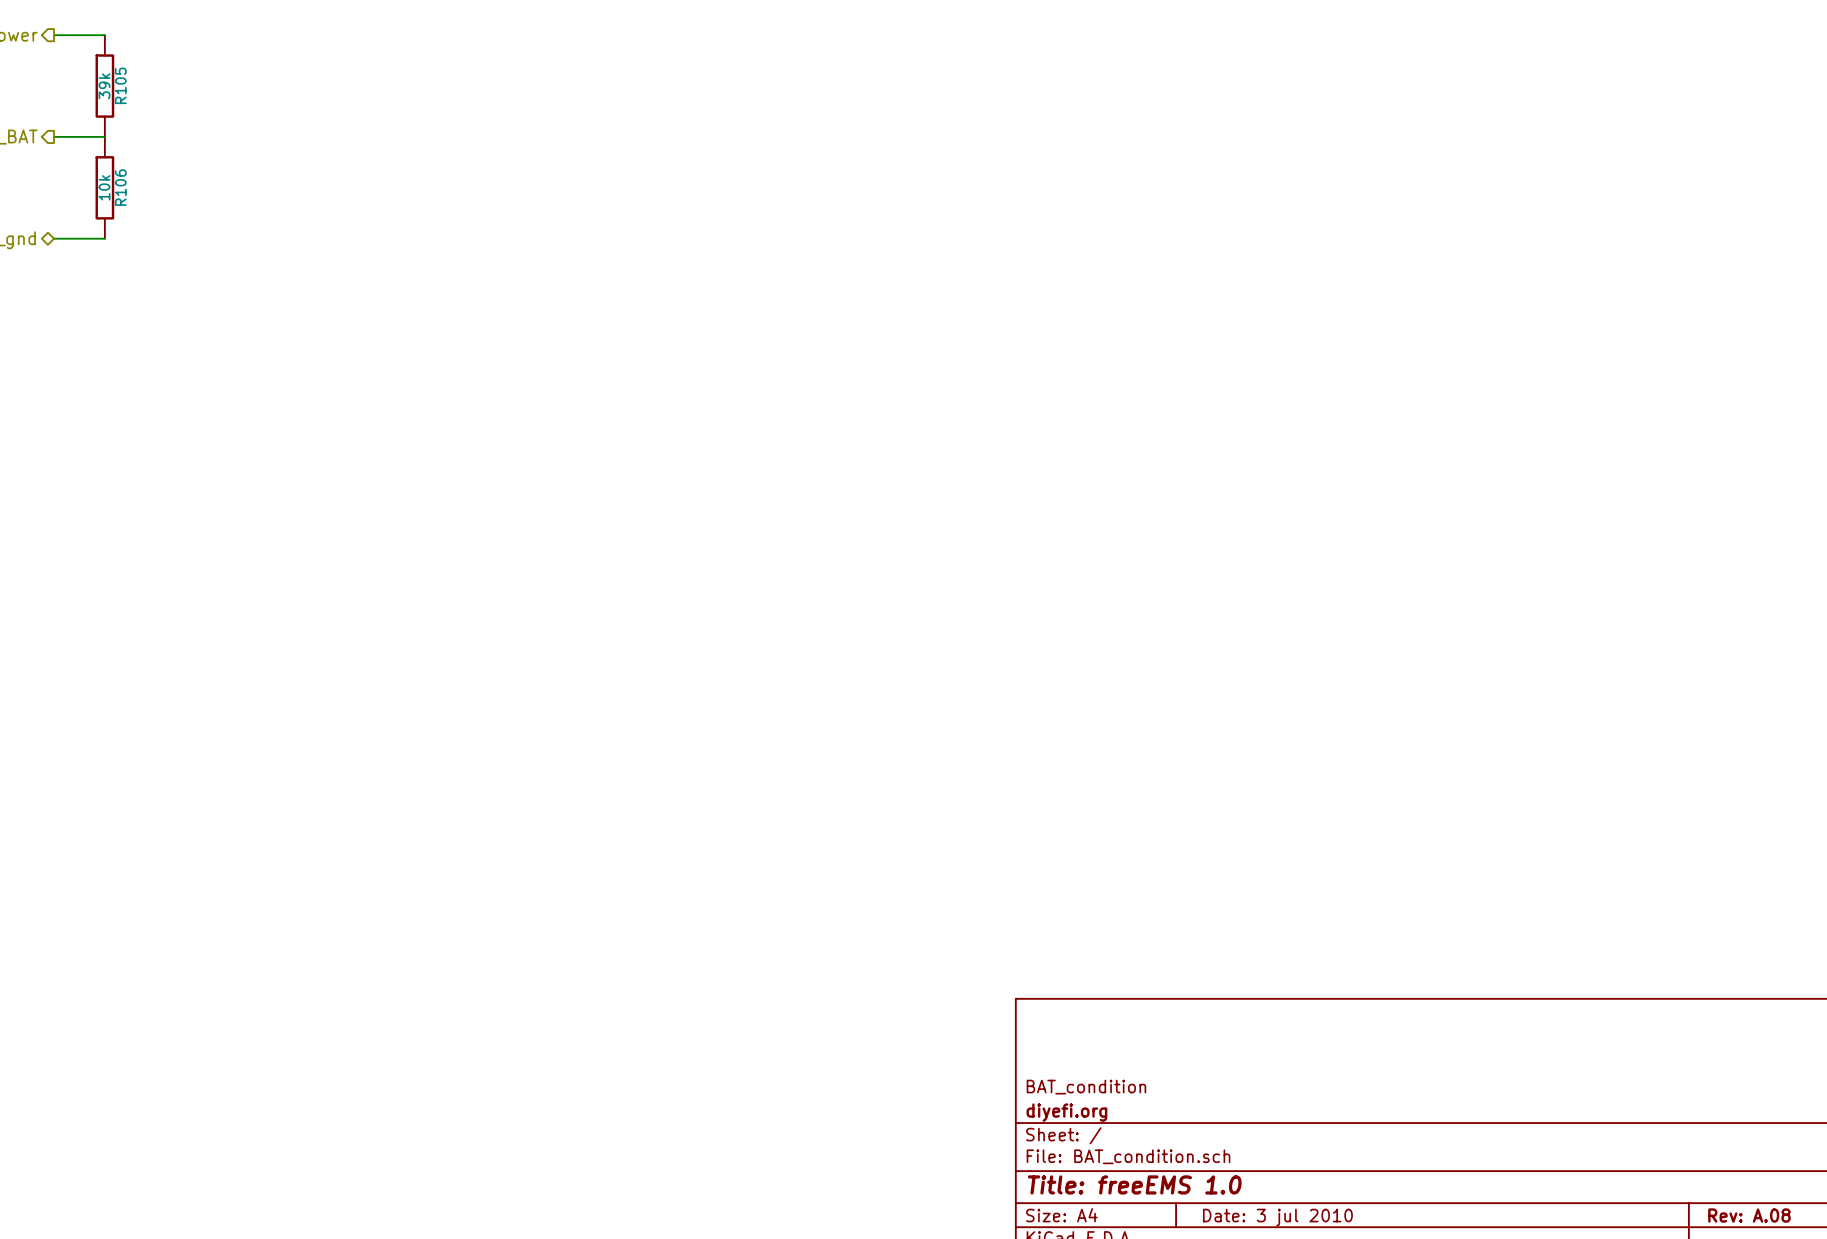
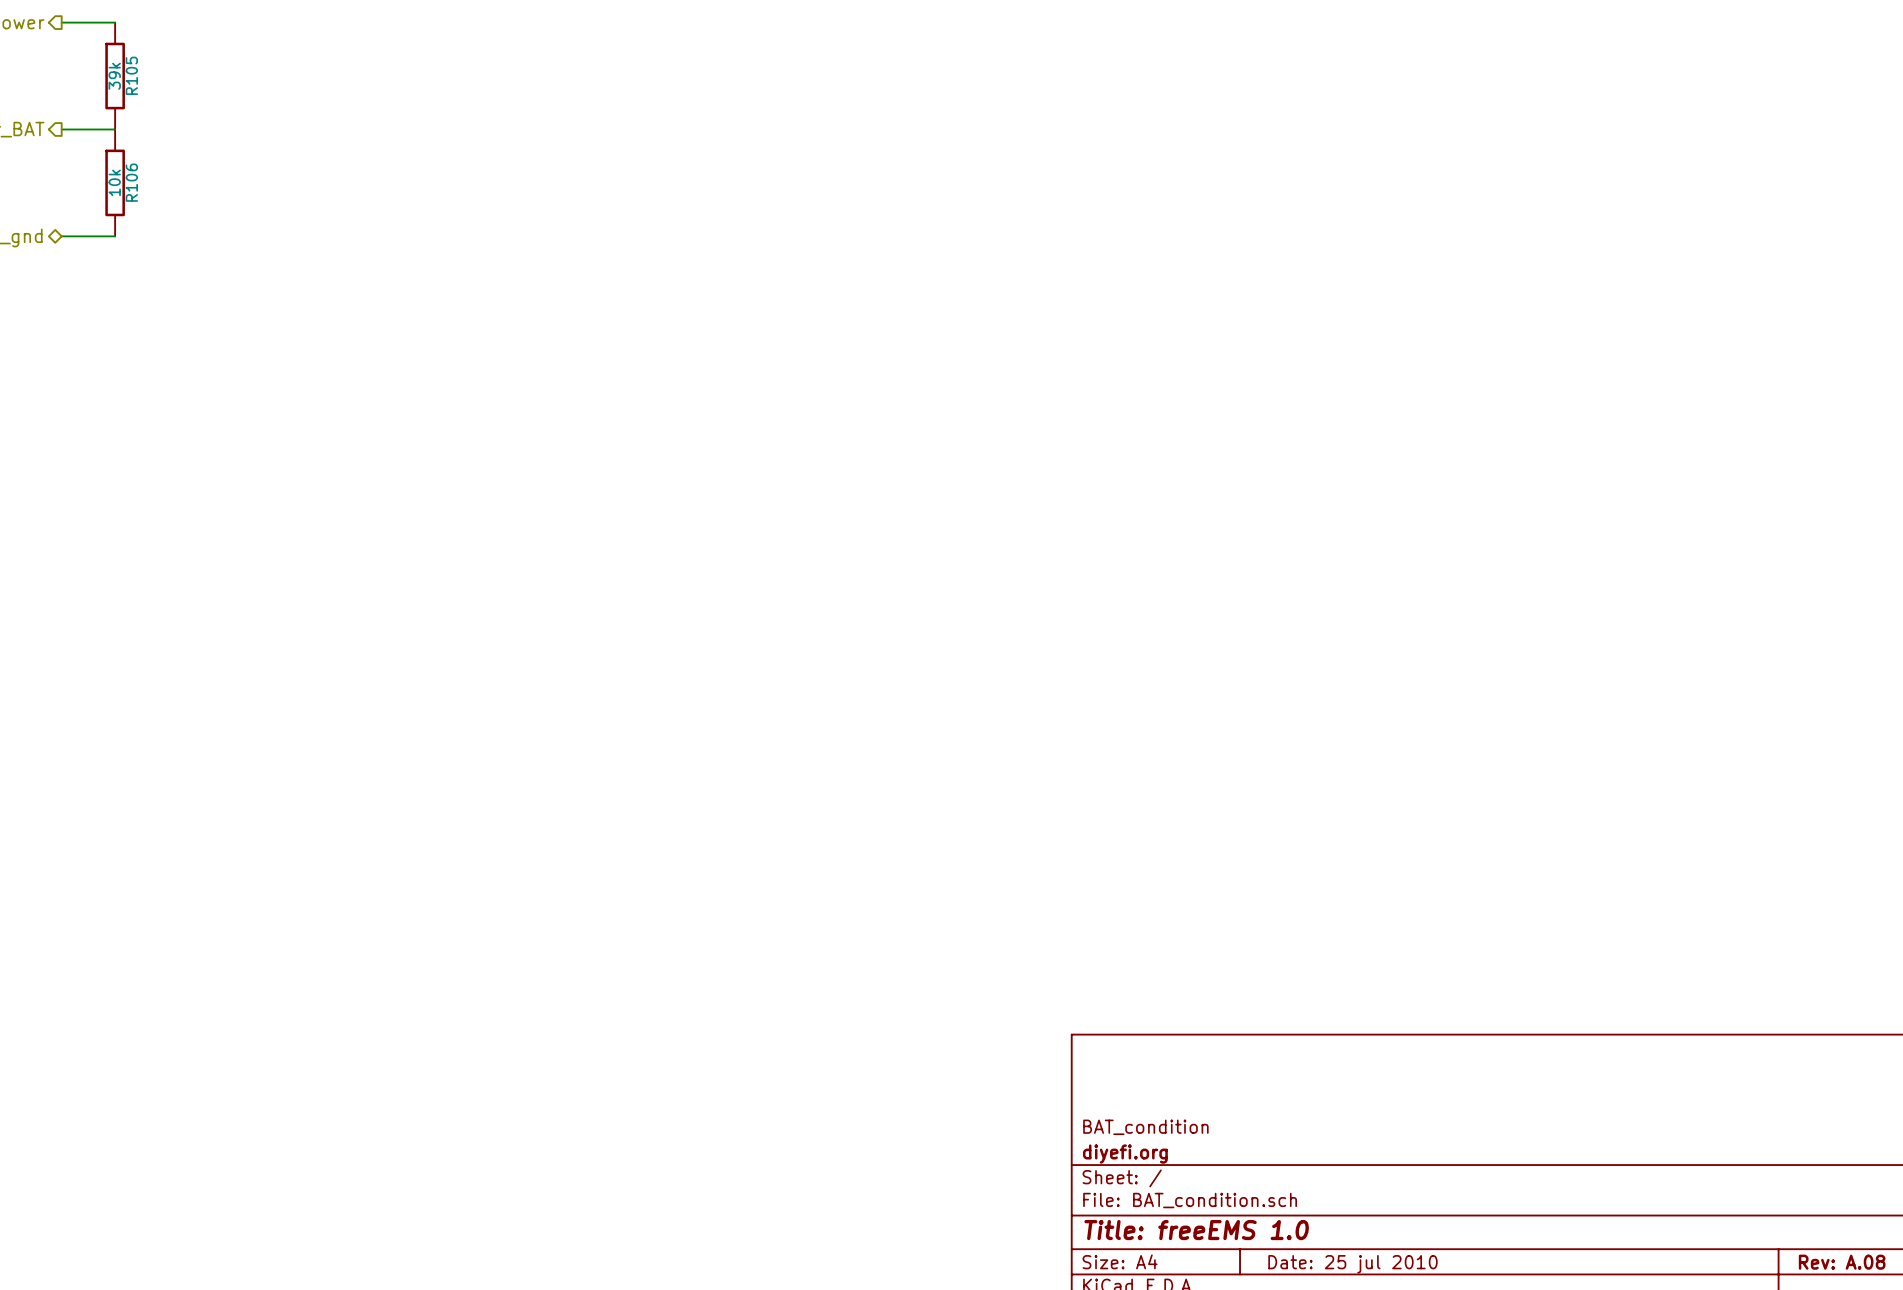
title block: Date: 3 jul 2010 (1277, 1217) -> Date: 25 jul 2010 (1352, 1264)

